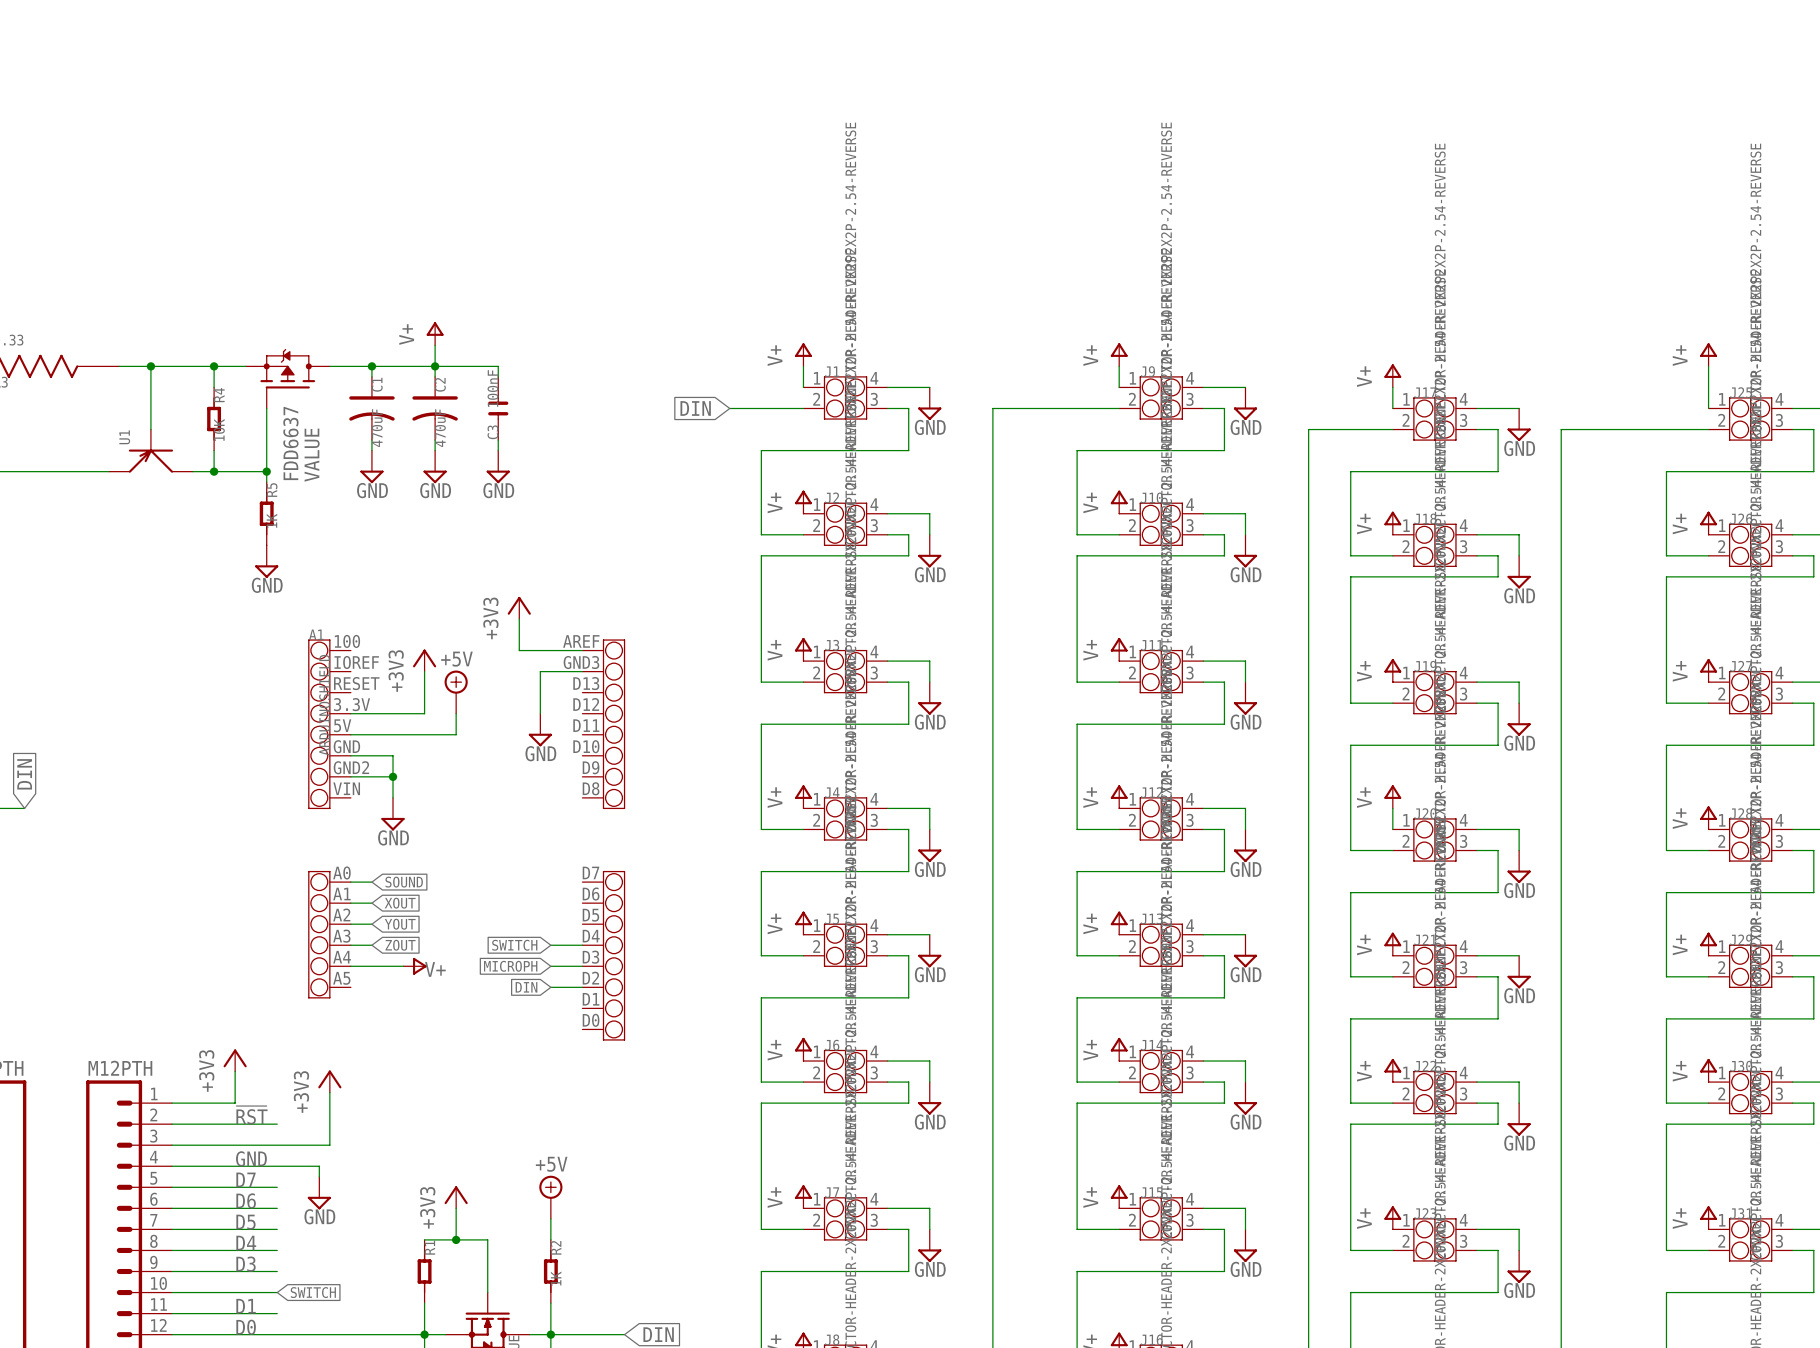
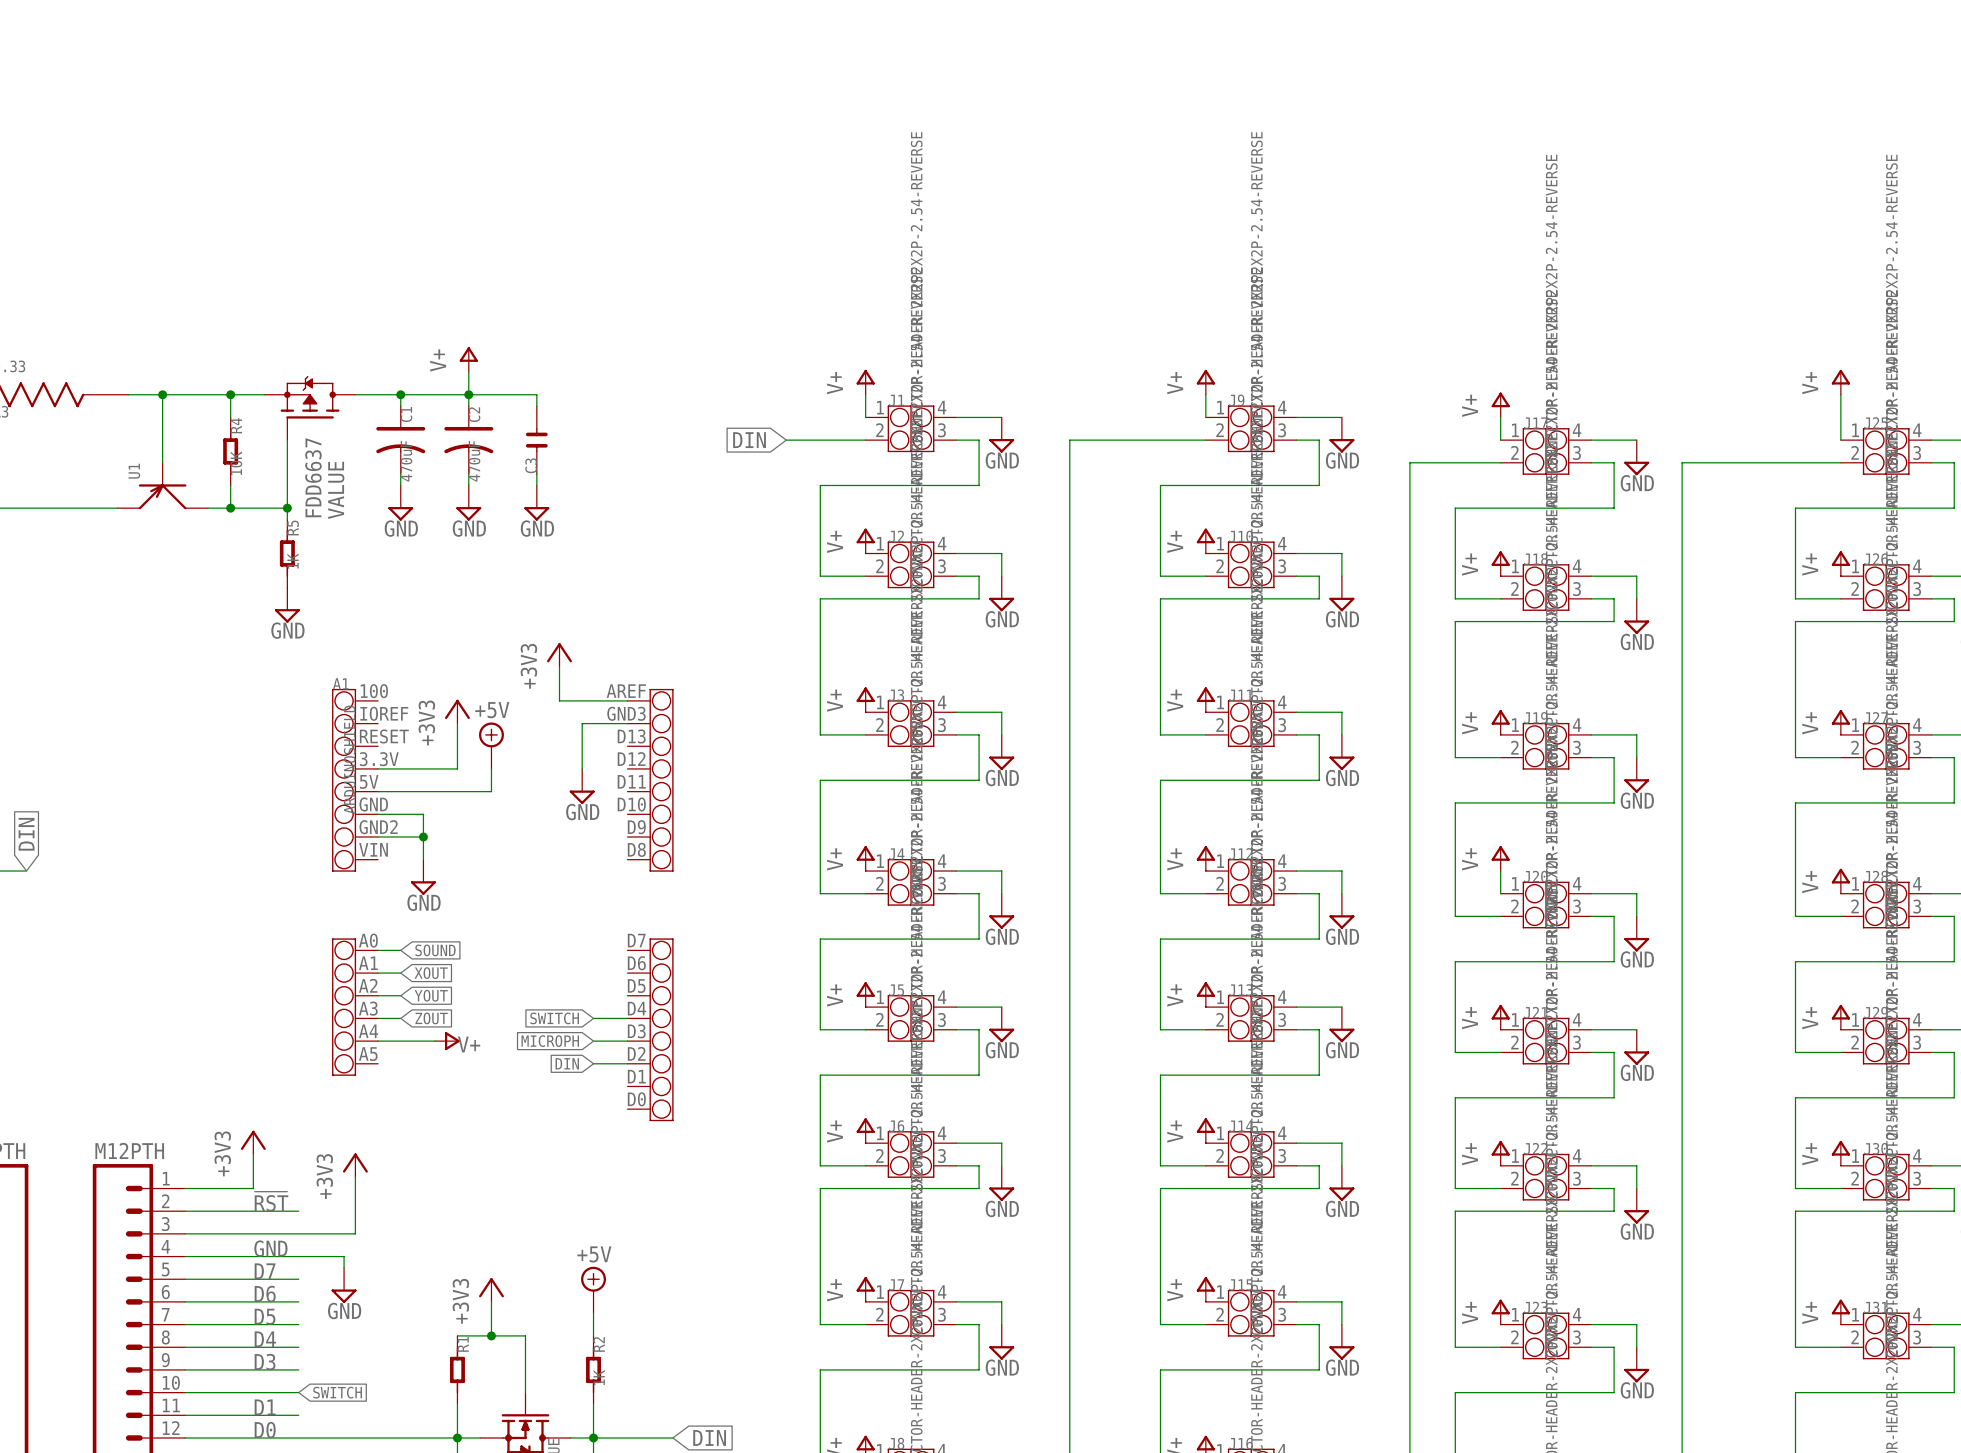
C3 value: 100nF (492, 388) -> none

